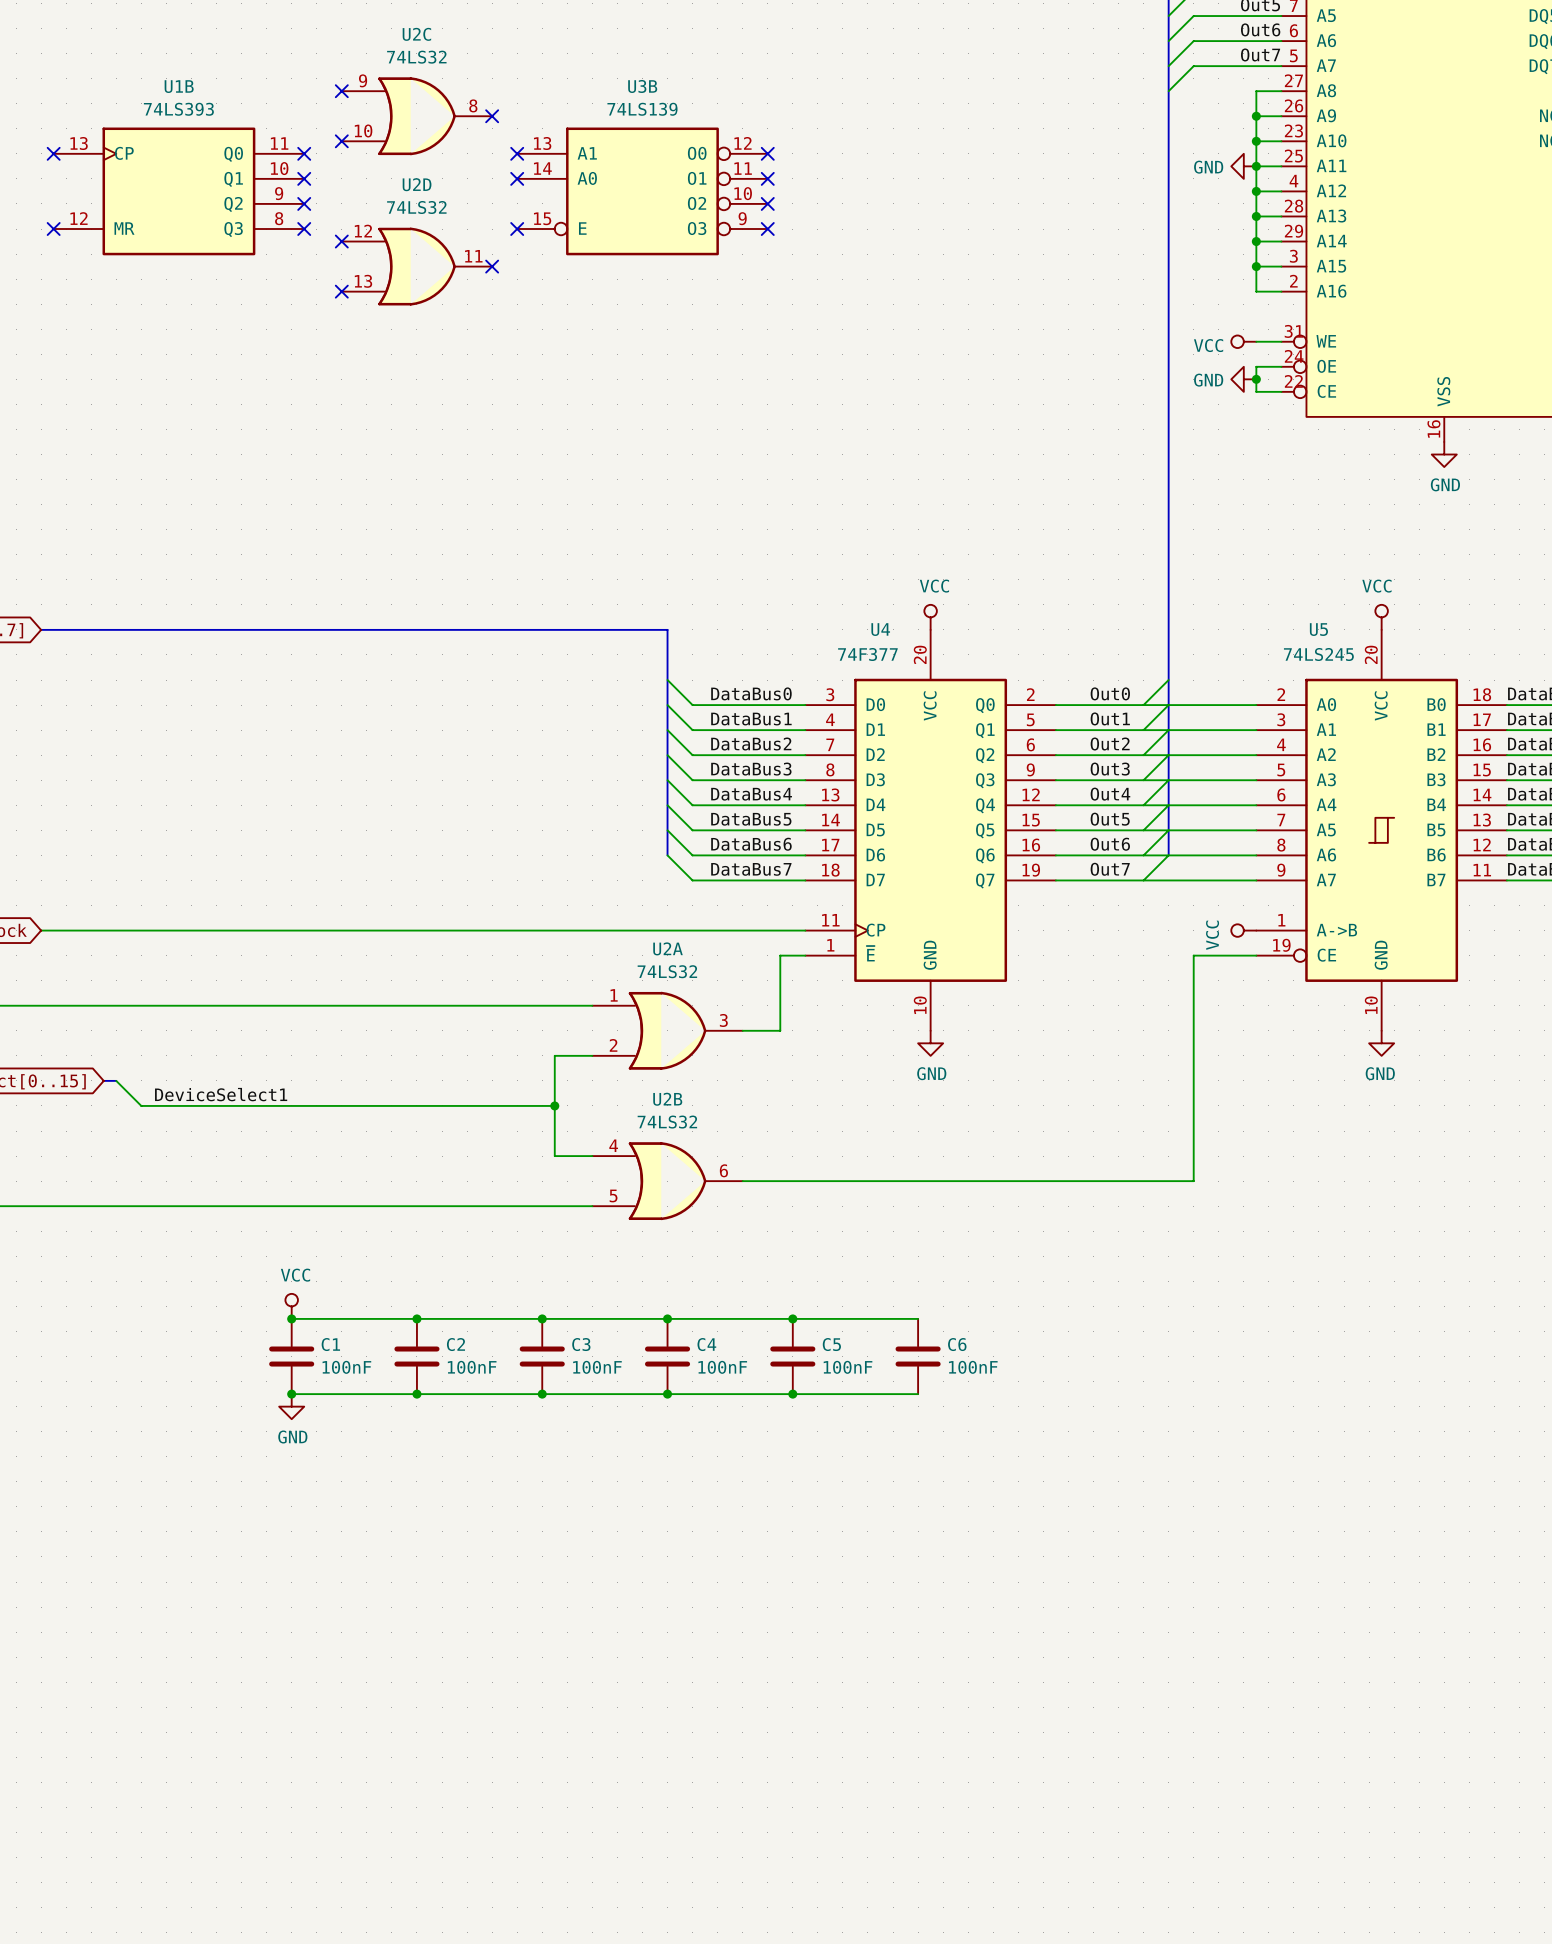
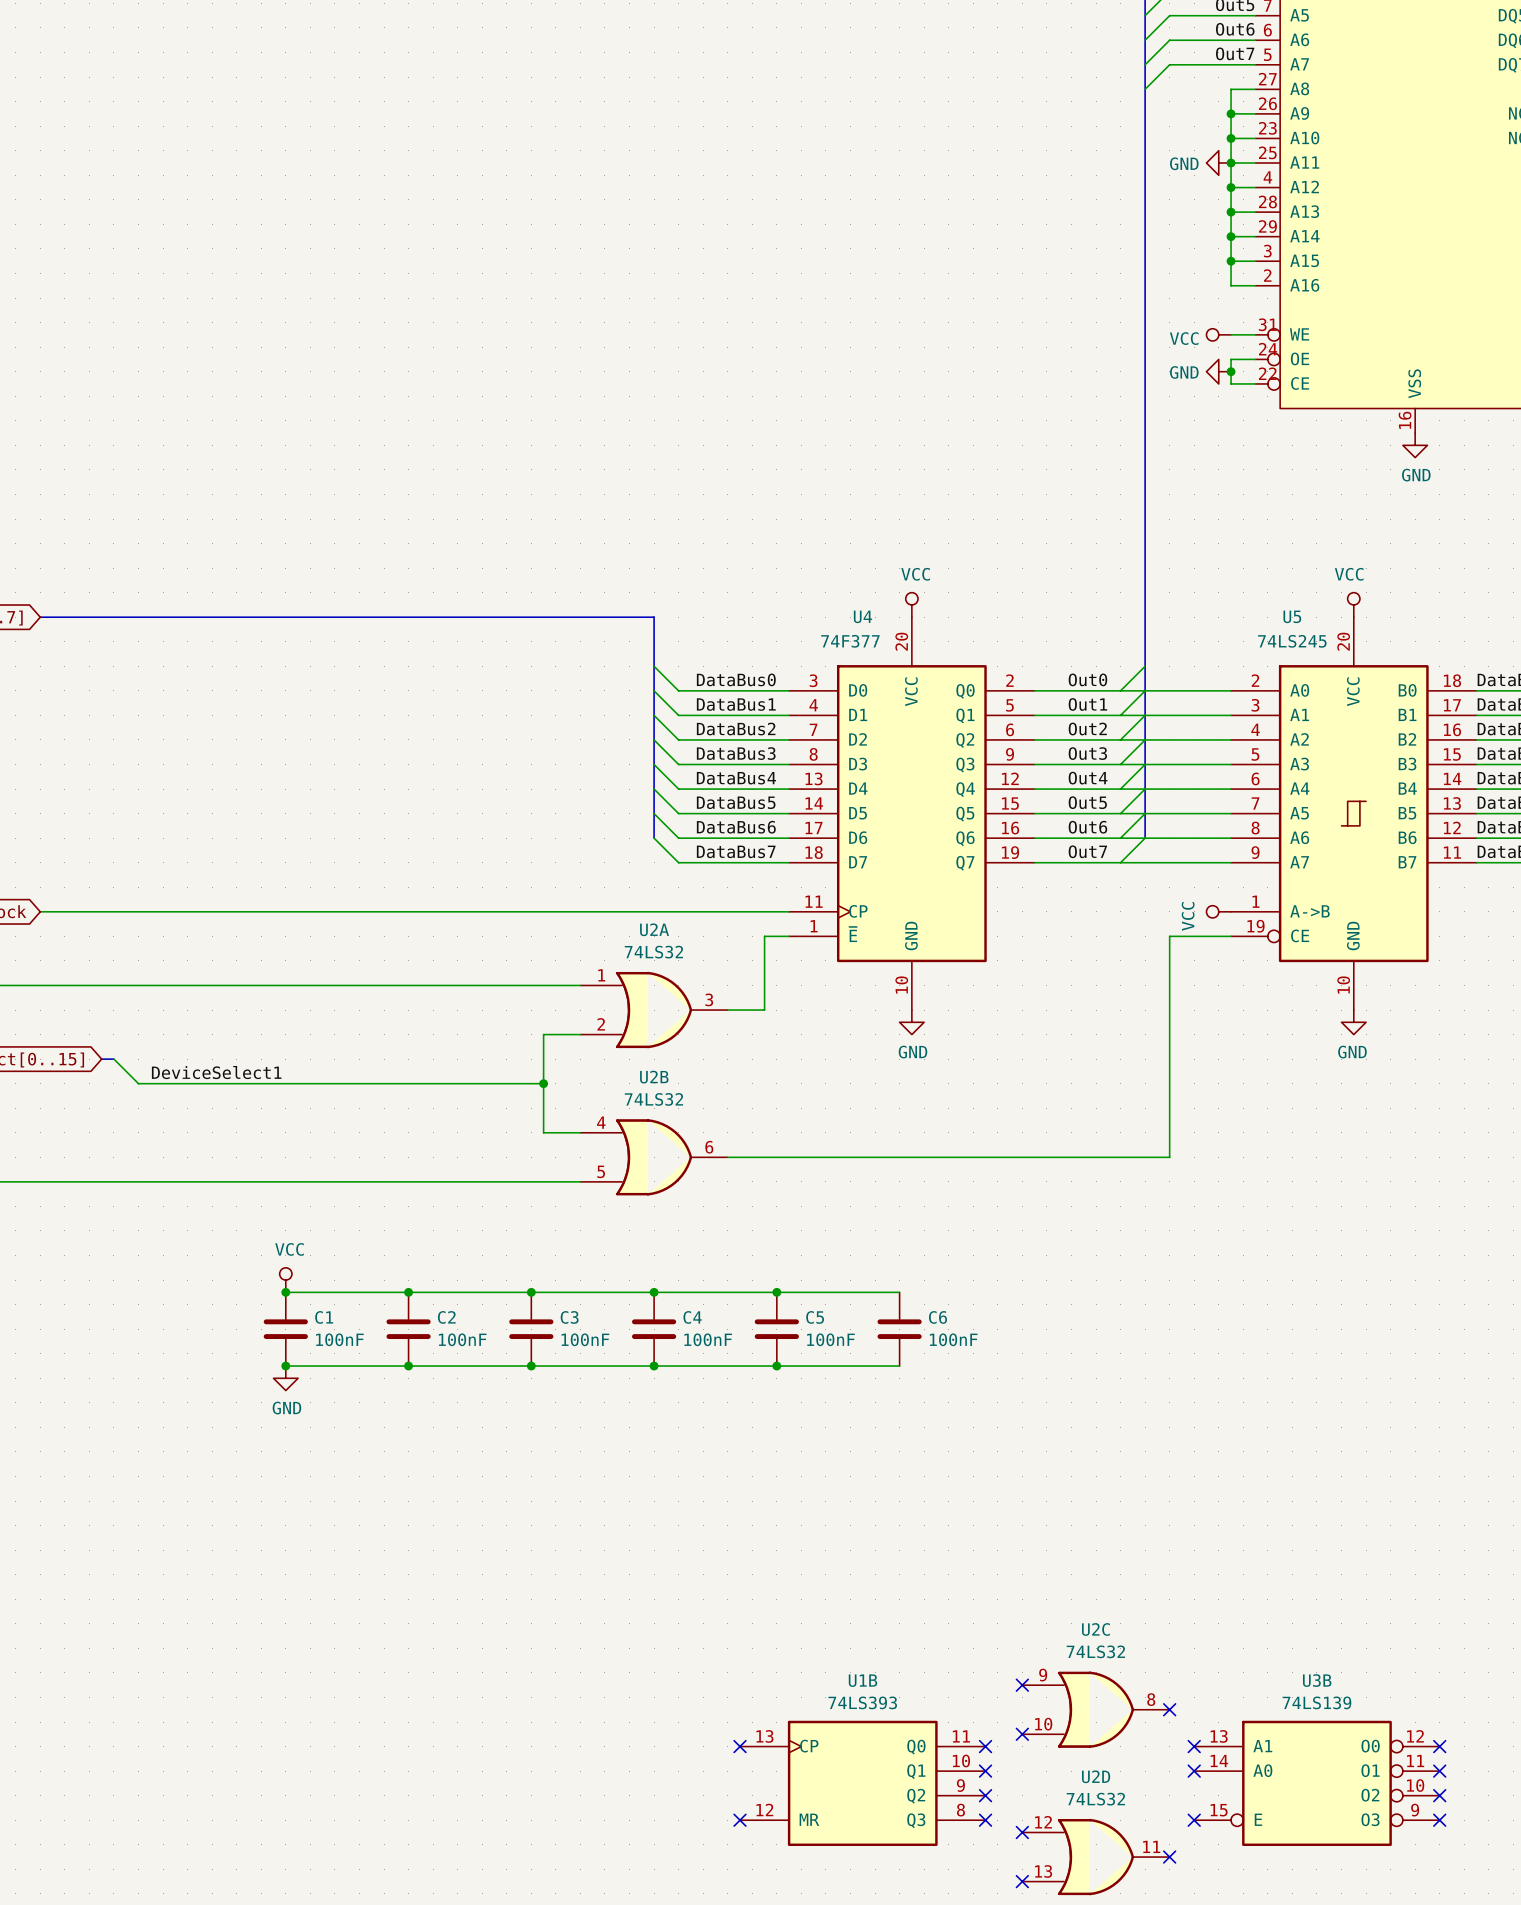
no-connect mark: (341, 91) -> none
U2C position: (416, 116) -> (1096, 1709)
no-connect mark: (492, 116) -> none
no-connect mark: (341, 141) -> none
no-connect mark: (53, 153) -> none
no-connect mark: (304, 153) -> none
no-connect mark: (517, 153) -> none
no-connect mark: (767, 153) -> none
no-connect mark: (304, 178) -> none
no-connect mark: (517, 178) -> none
no-connect mark: (767, 178) -> none
U1B position: (178, 191) -> (862, 1783)
U3B position: (642, 191) -> (1316, 1783)
no-connect mark: (304, 203) -> none
no-connect mark: (767, 203) -> none
no-connect mark: (53, 229) -> none
no-connect mark: (304, 229) -> none
no-connect mark: (517, 229) -> none
no-connect mark: (767, 229) -> none
no-connect mark: (341, 241) -> none
U2D position: (416, 266) -> (1096, 1857)
no-connect mark: (492, 266) -> none
no-connect mark: (341, 291) -> none
no-connect mark: none -> (1022, 1685)
no-connect mark: none -> (1169, 1709)
no-connect mark: none -> (1022, 1734)
no-connect mark: none -> (740, 1746)
no-connect mark: none -> (985, 1746)
no-connect mark: none -> (1194, 1746)
no-connect mark: none -> (1439, 1746)
no-connect mark: none -> (985, 1771)
no-connect mark: none -> (1194, 1771)
no-connect mark: none -> (1439, 1771)
no-connect mark: none -> (985, 1795)
no-connect mark: none -> (1439, 1795)
no-connect mark: none -> (740, 1820)
no-connect mark: none -> (985, 1820)
no-connect mark: none -> (1194, 1820)
no-connect mark: none -> (1439, 1820)
no-connect mark: none -> (1022, 1832)
no-connect mark: none -> (1169, 1857)
no-connect mark: none -> (1022, 1881)

